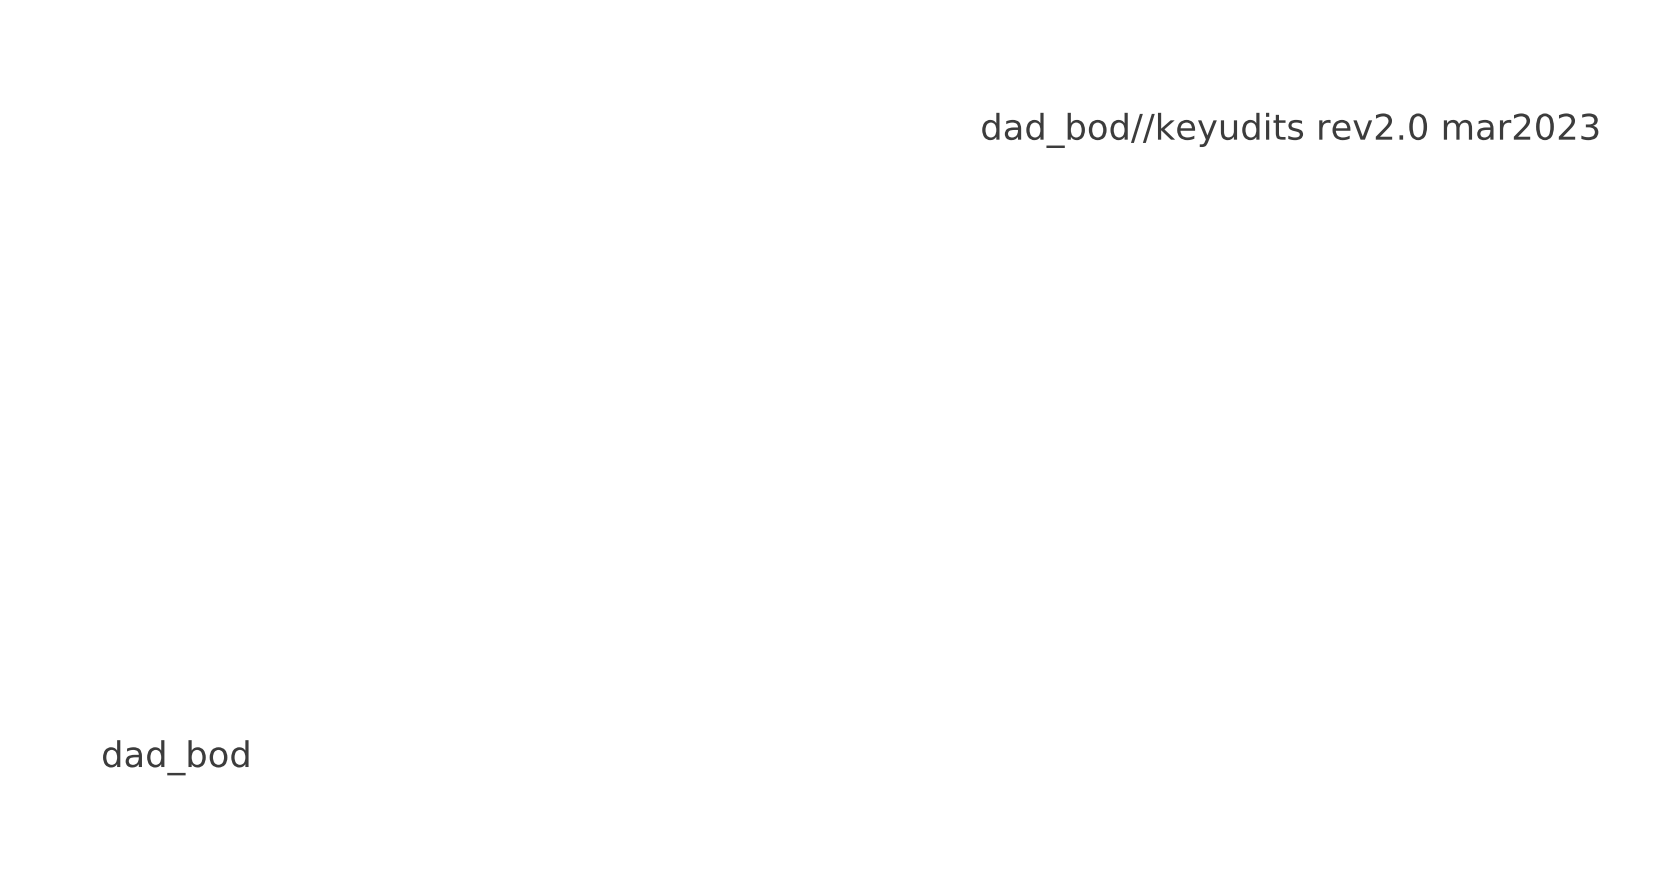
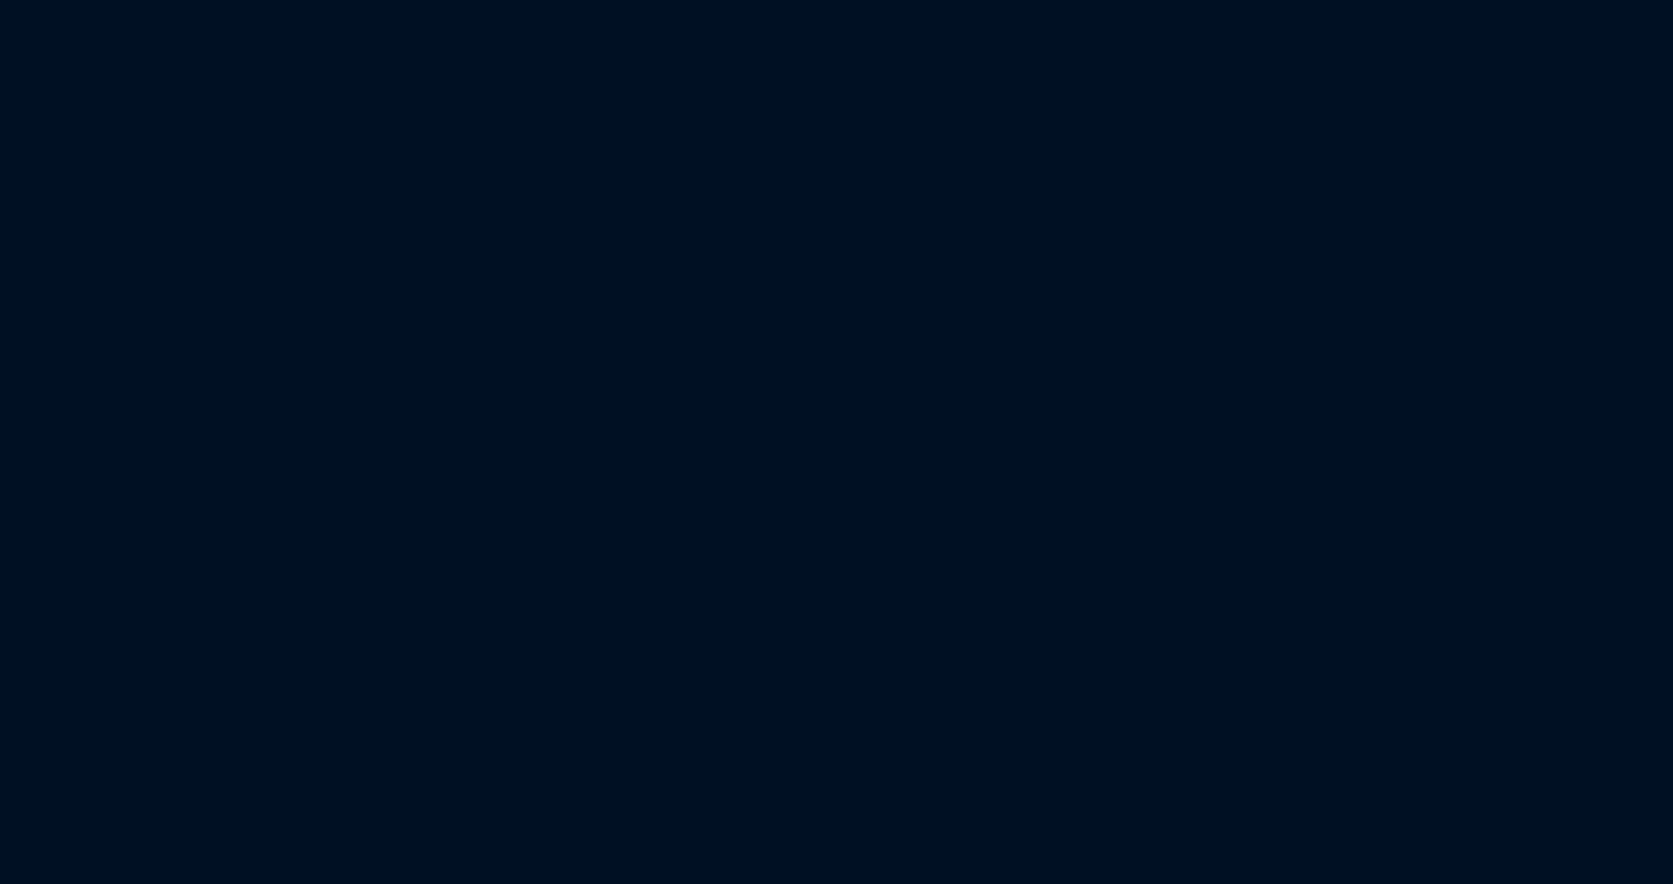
text: dad_bod//keyudits rev2.0 mar2023 (1290, 130) -> none
text: dad_bod (175, 757) -> none

